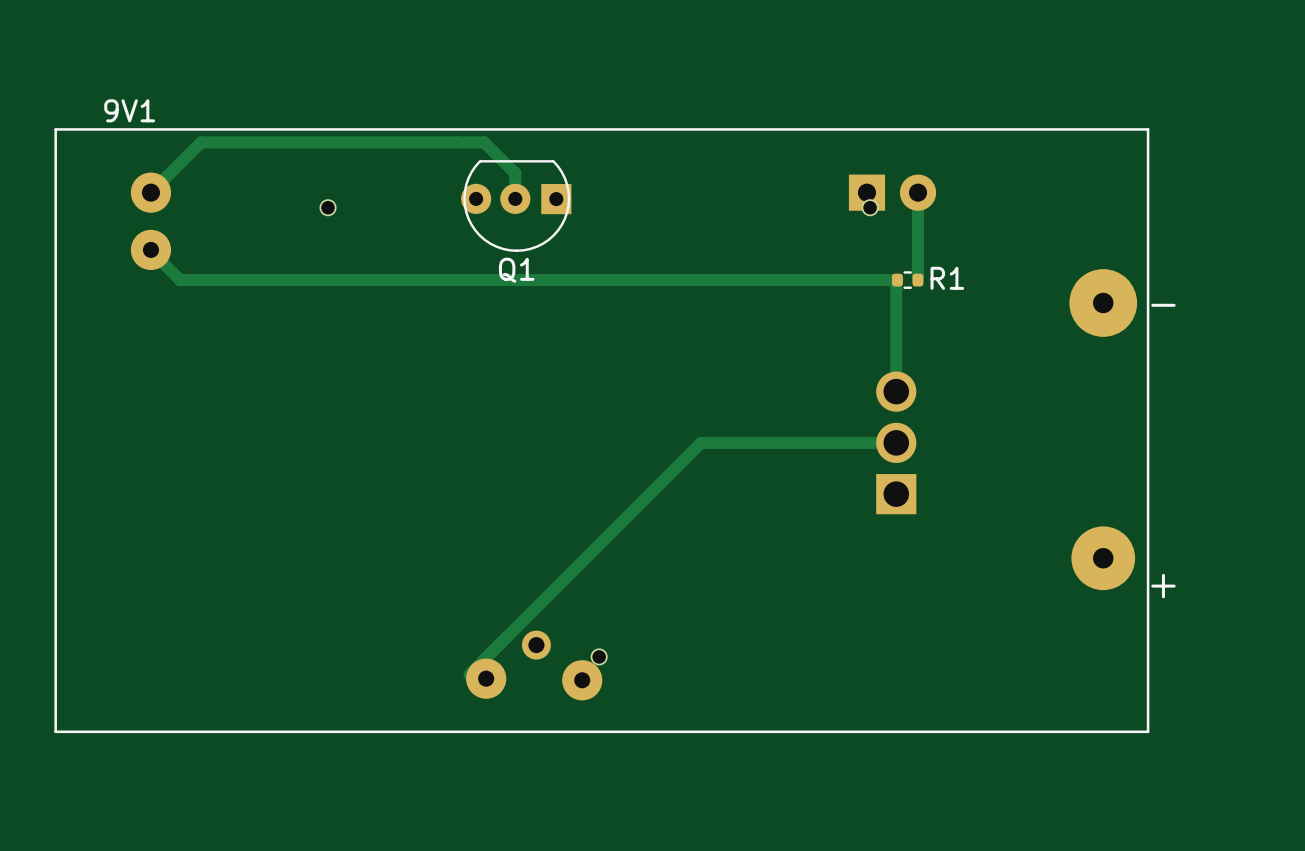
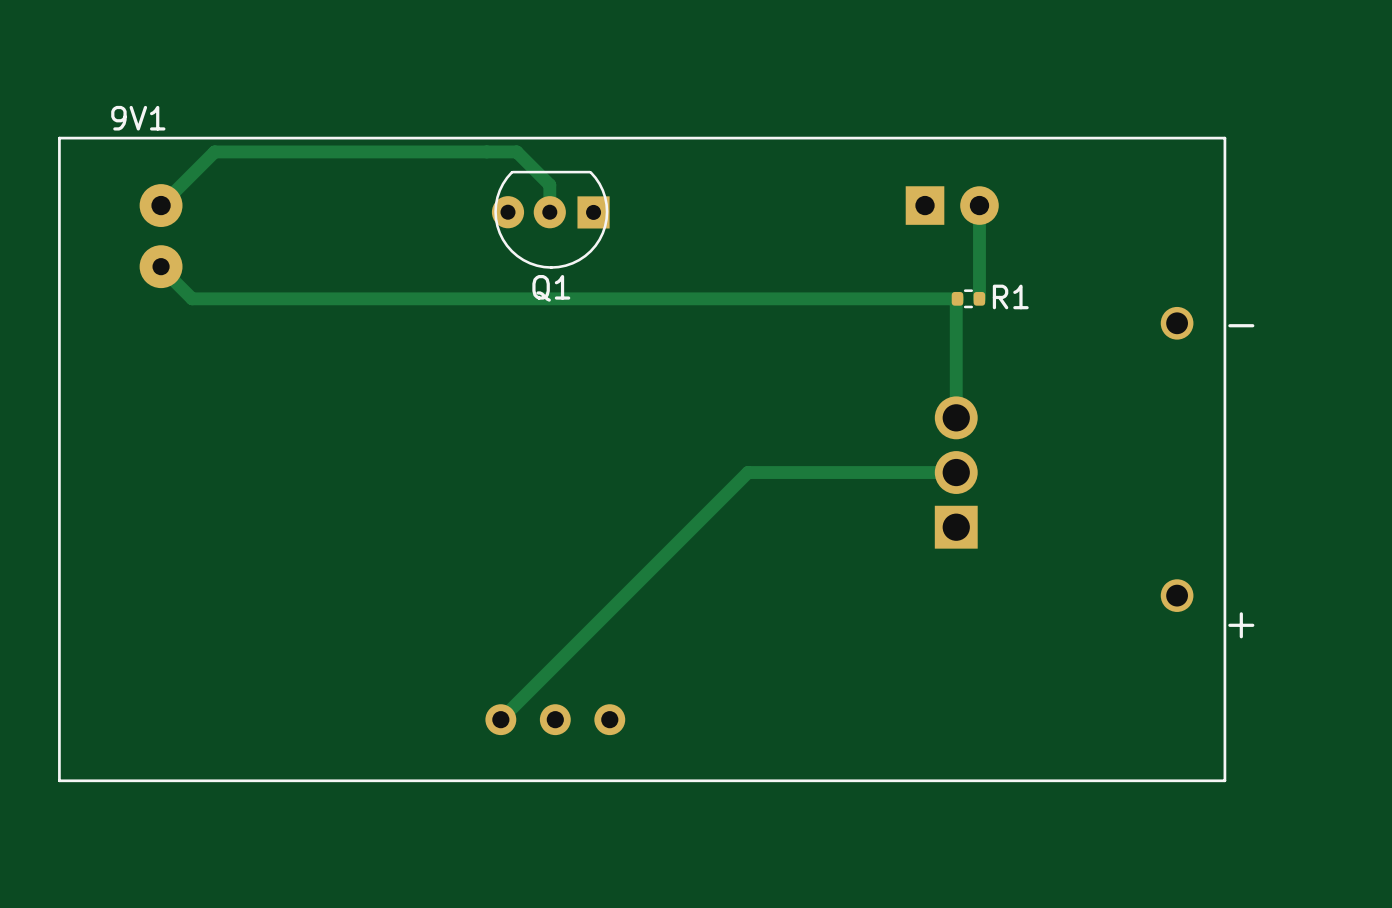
9V1 footprint: [54, 128, 1150, 734] -> [58, 136, 1227, 783]
part footprint: [466, 630, 603, 701] -> [485, 704, 626, 736]

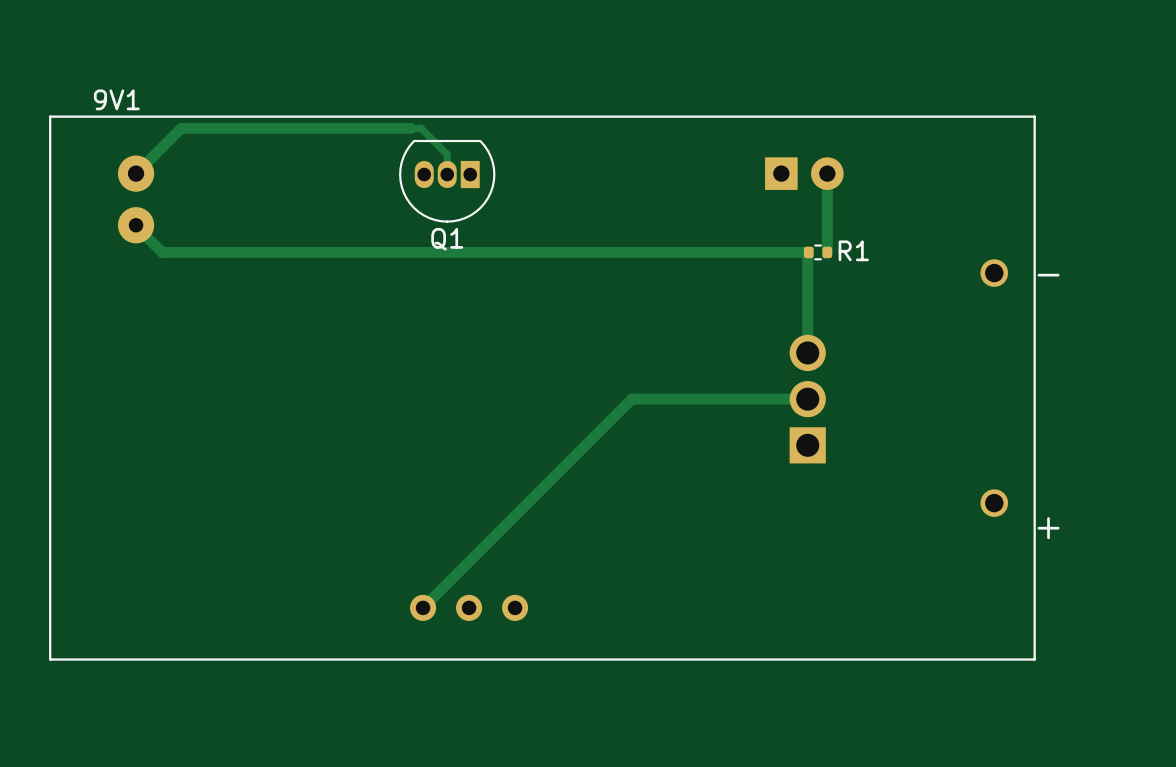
track: (486, 151) (516, 151) (549, 184) (549, 212) -> none
track: none -> (420, 128) (447, 154) (447, 174) (447, 171)
Q1 footprint: [491, 170, 610, 269] -> [399, 139, 496, 223]

